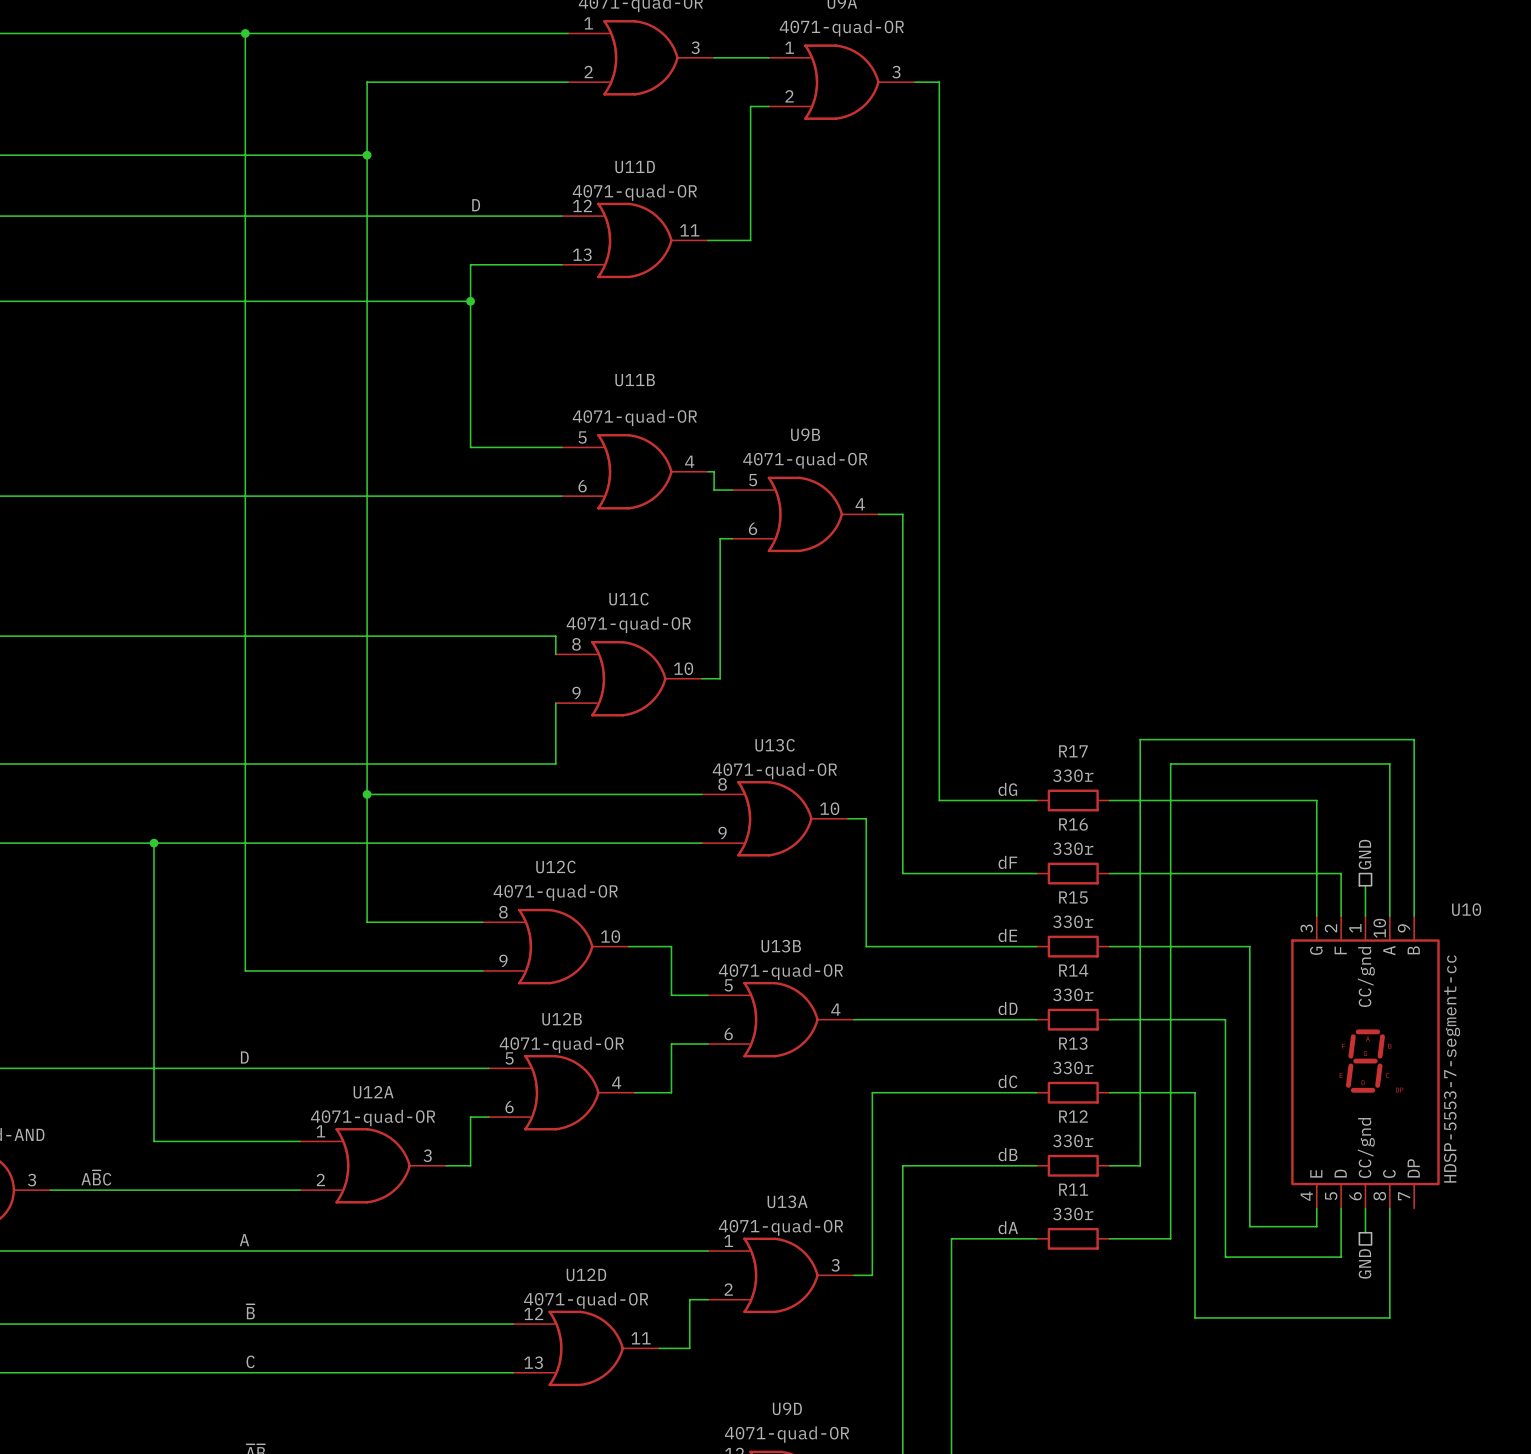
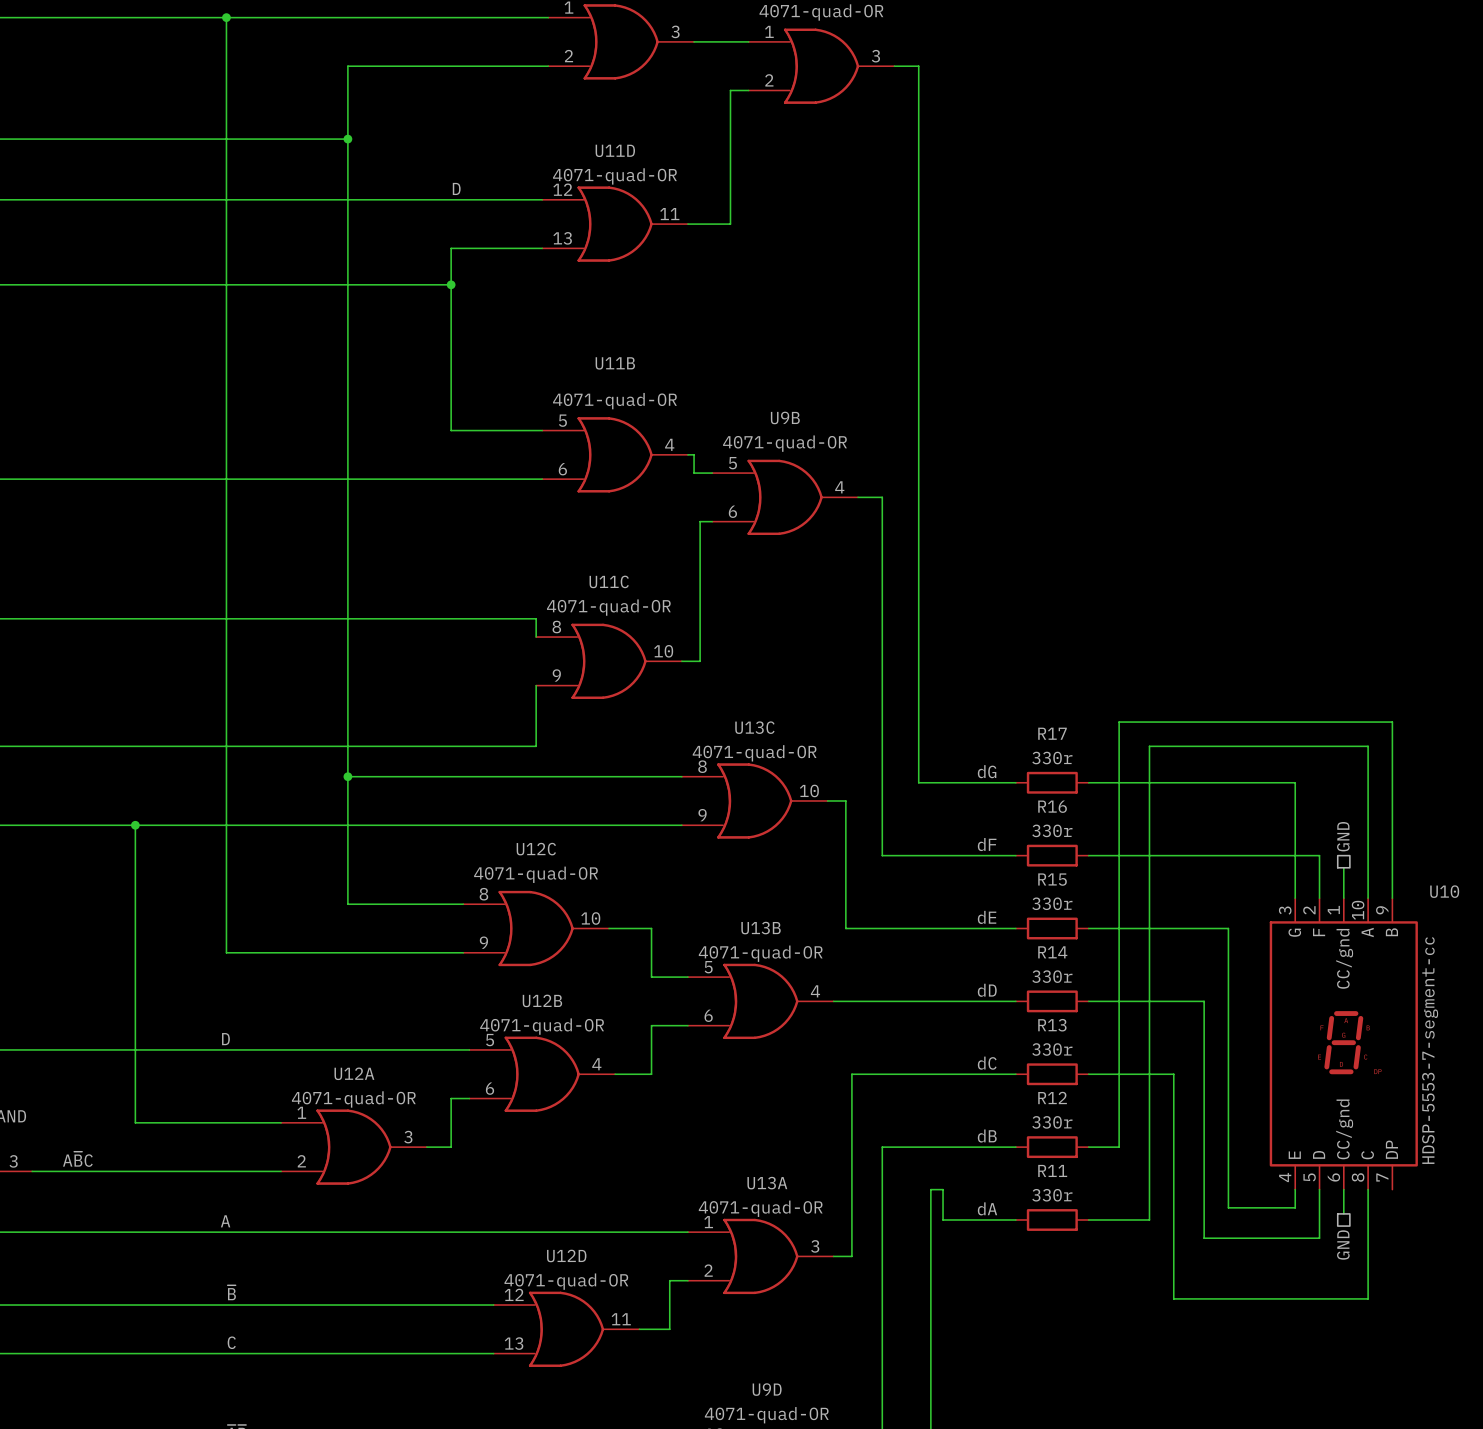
wire: (951, 1238) (963, 1238) -> (930, 1219) (930, 1189) (943, 1189) (943, 1219)

